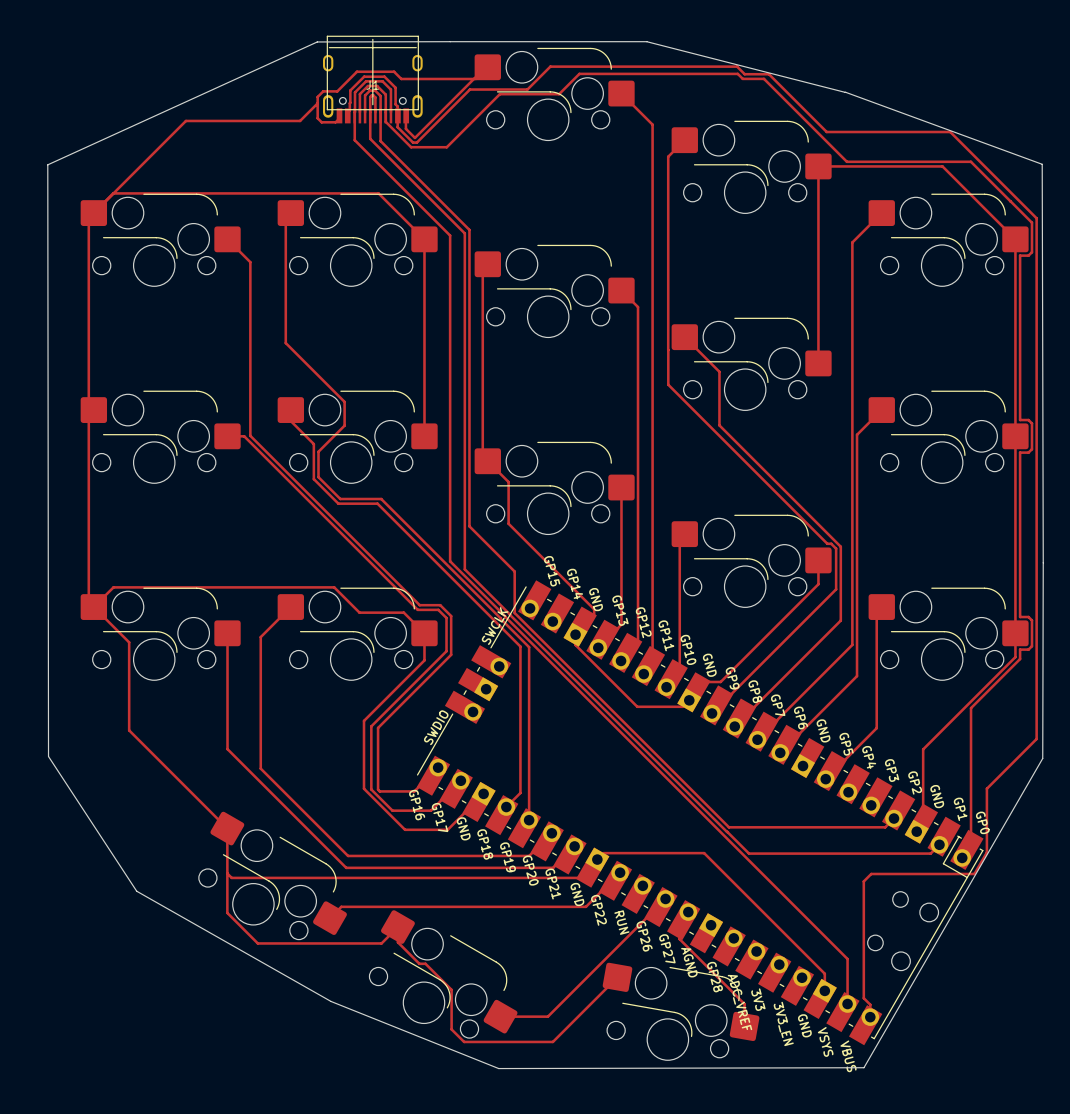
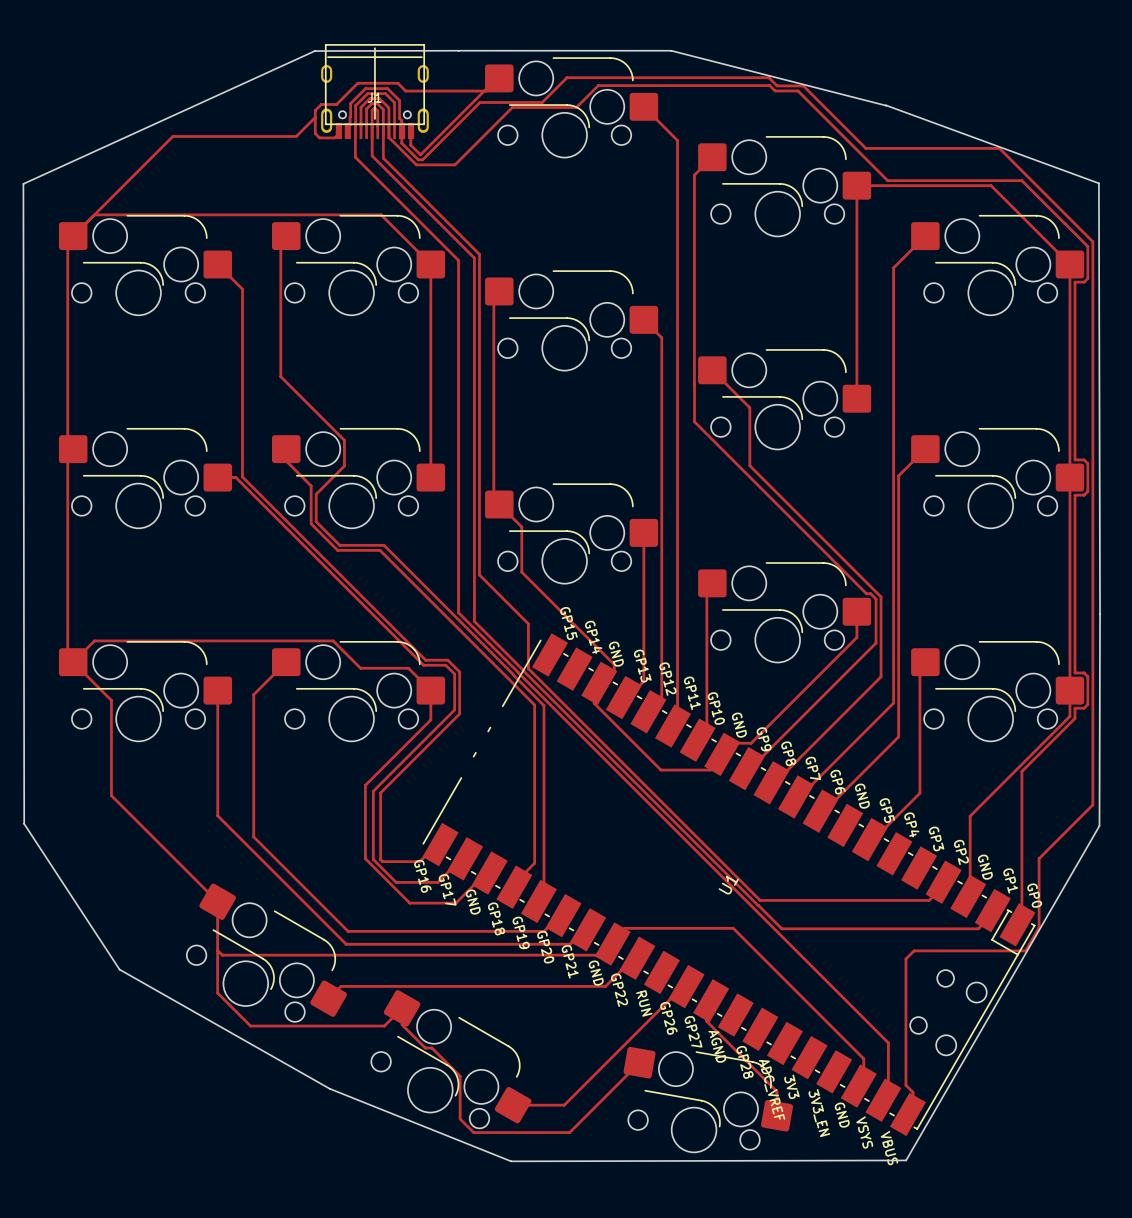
part: (700, 812) -> none
U1: none -> (728, 884)

